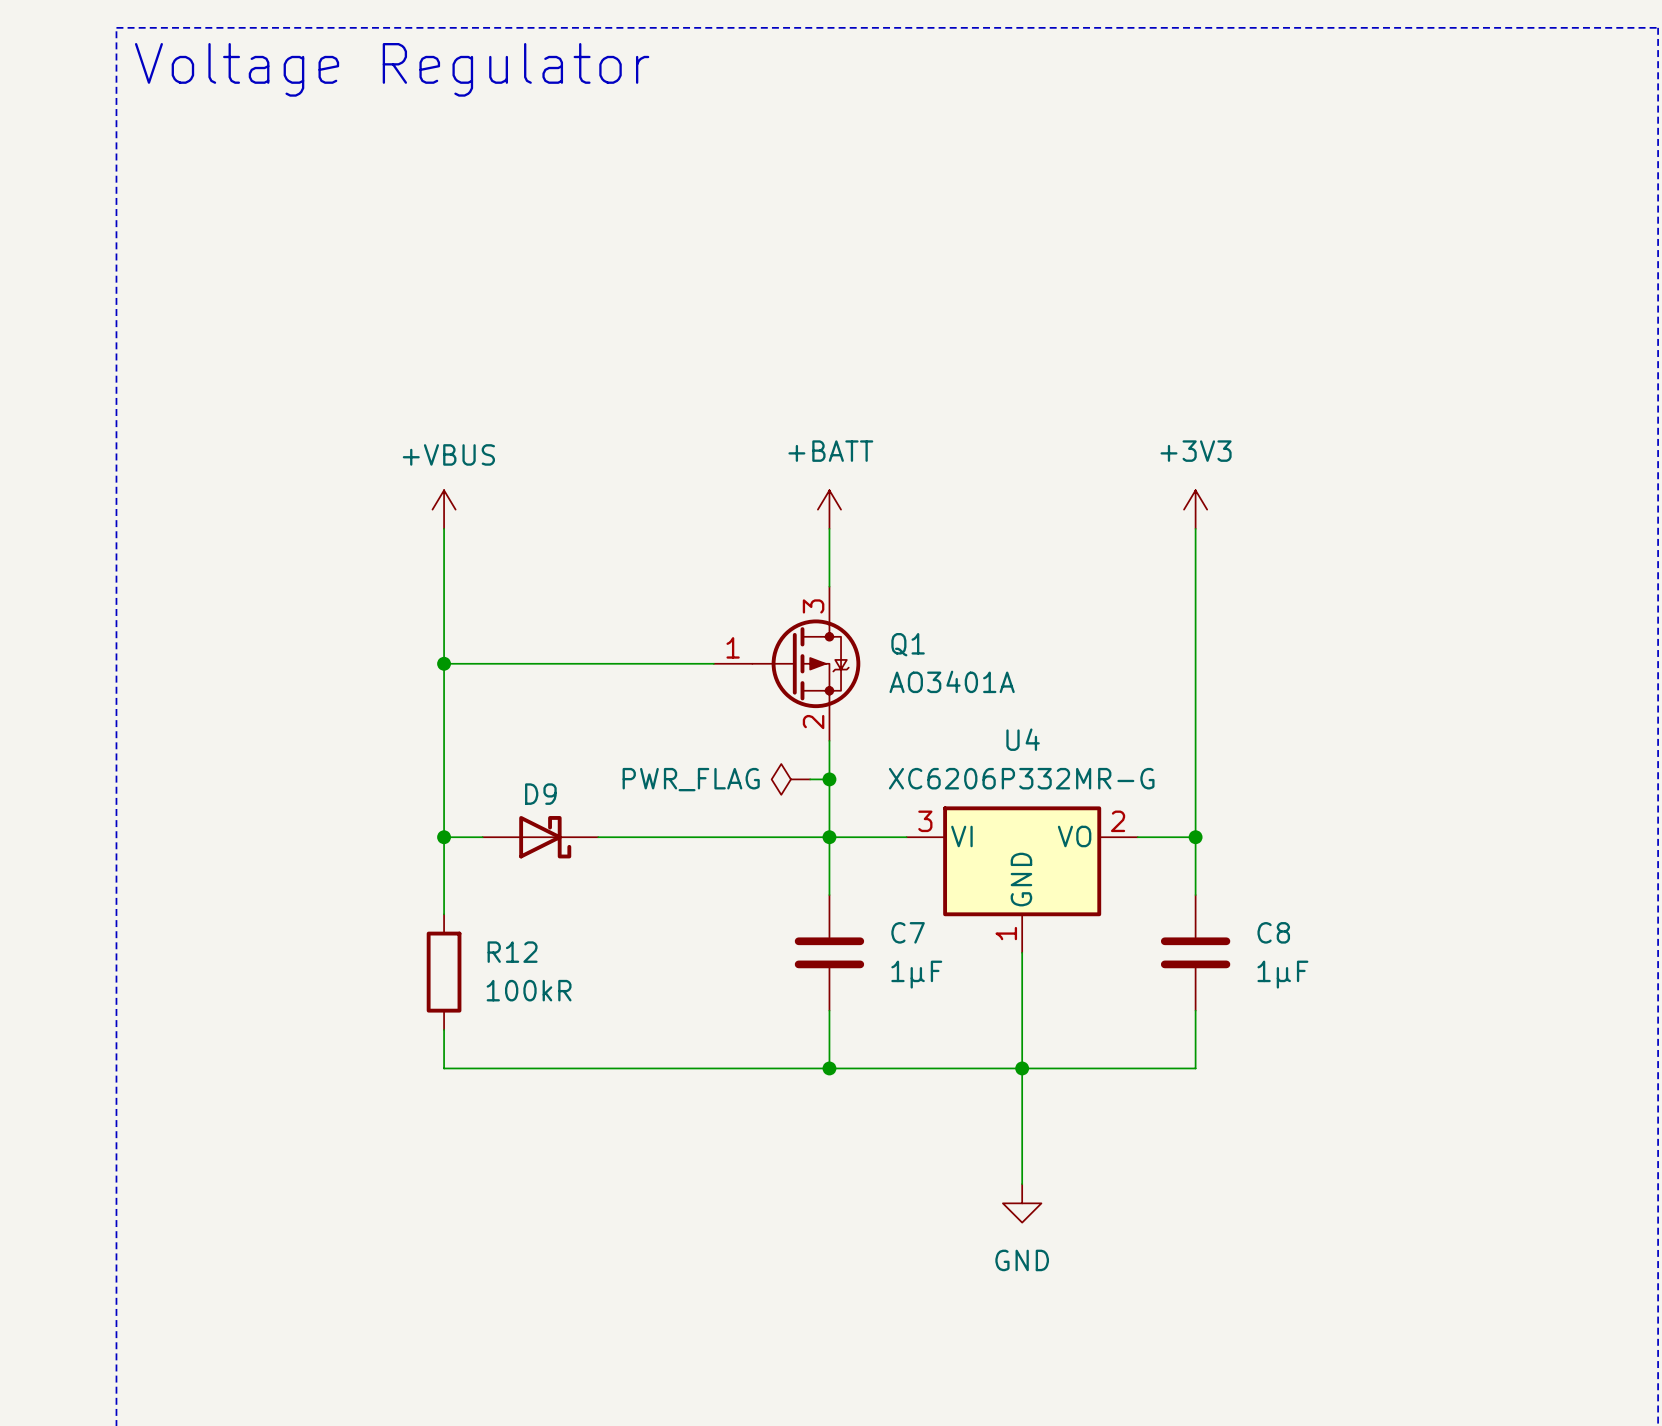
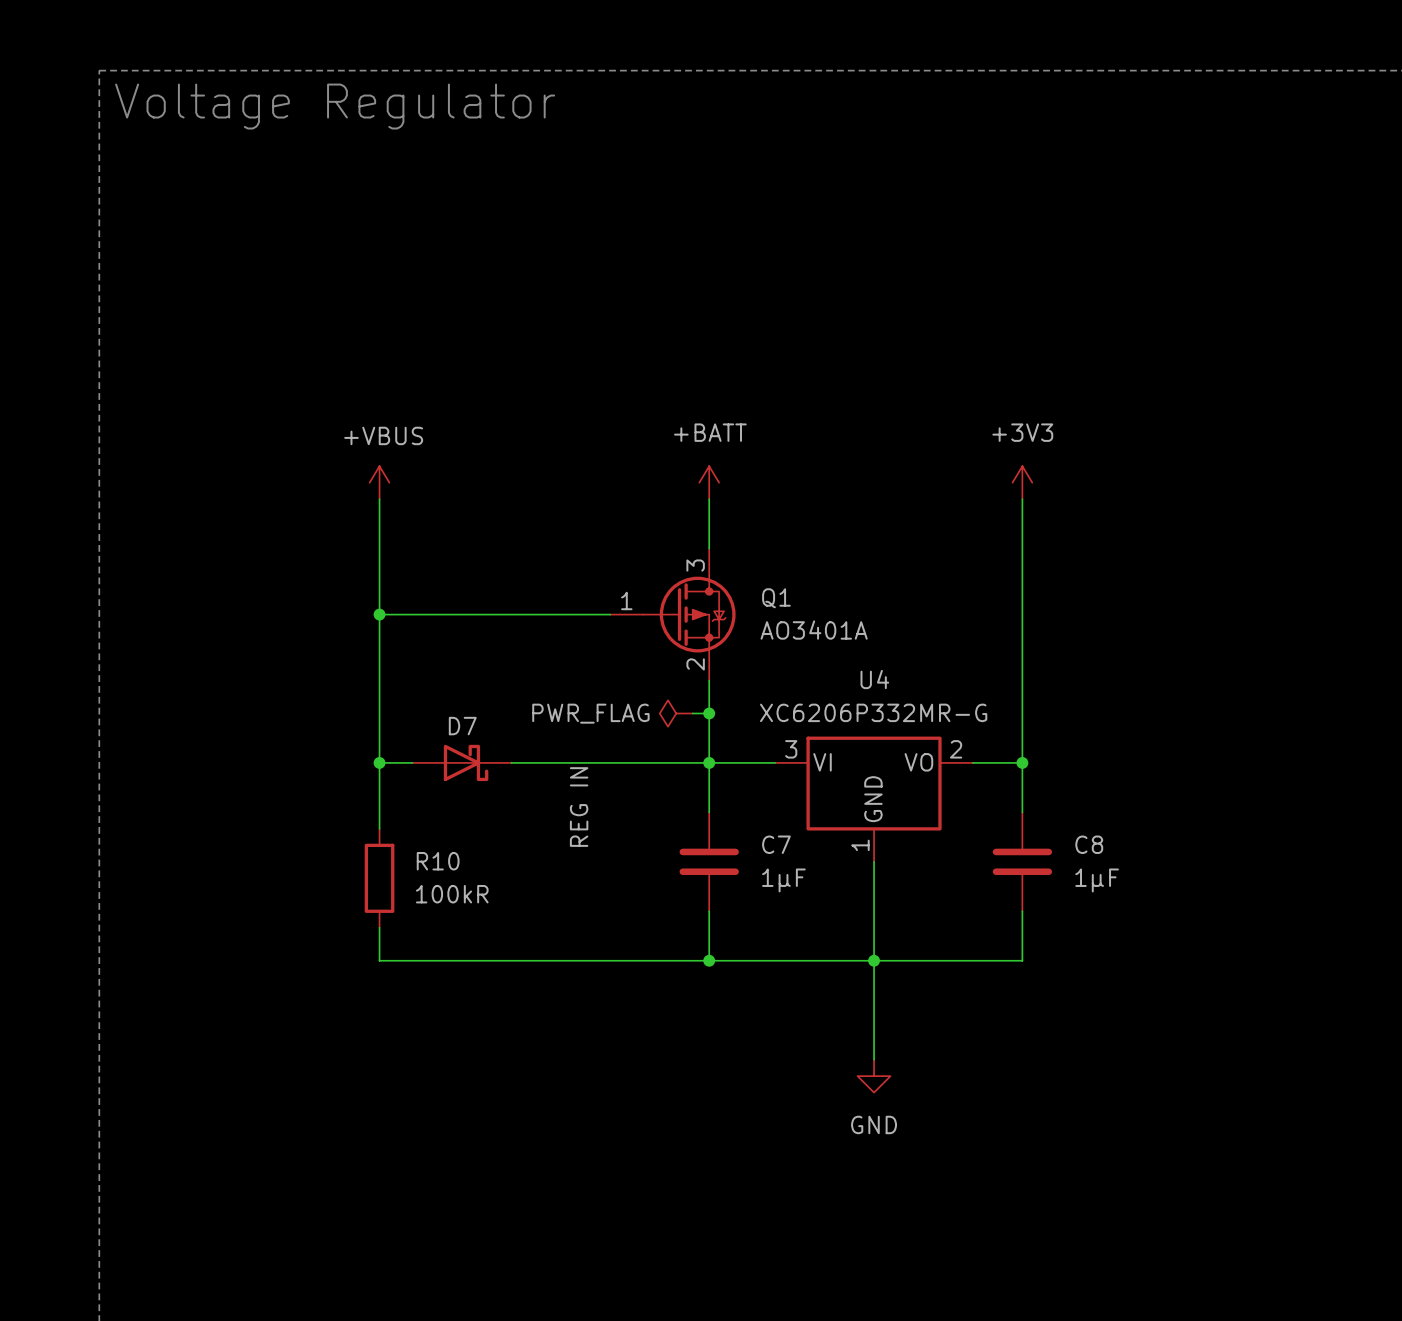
D9 name: D9 (540, 794) -> D7 (462, 726)
label: none -> REG IN (579, 807)
R12 name: R12 (512, 952) -> R10 (438, 861)

